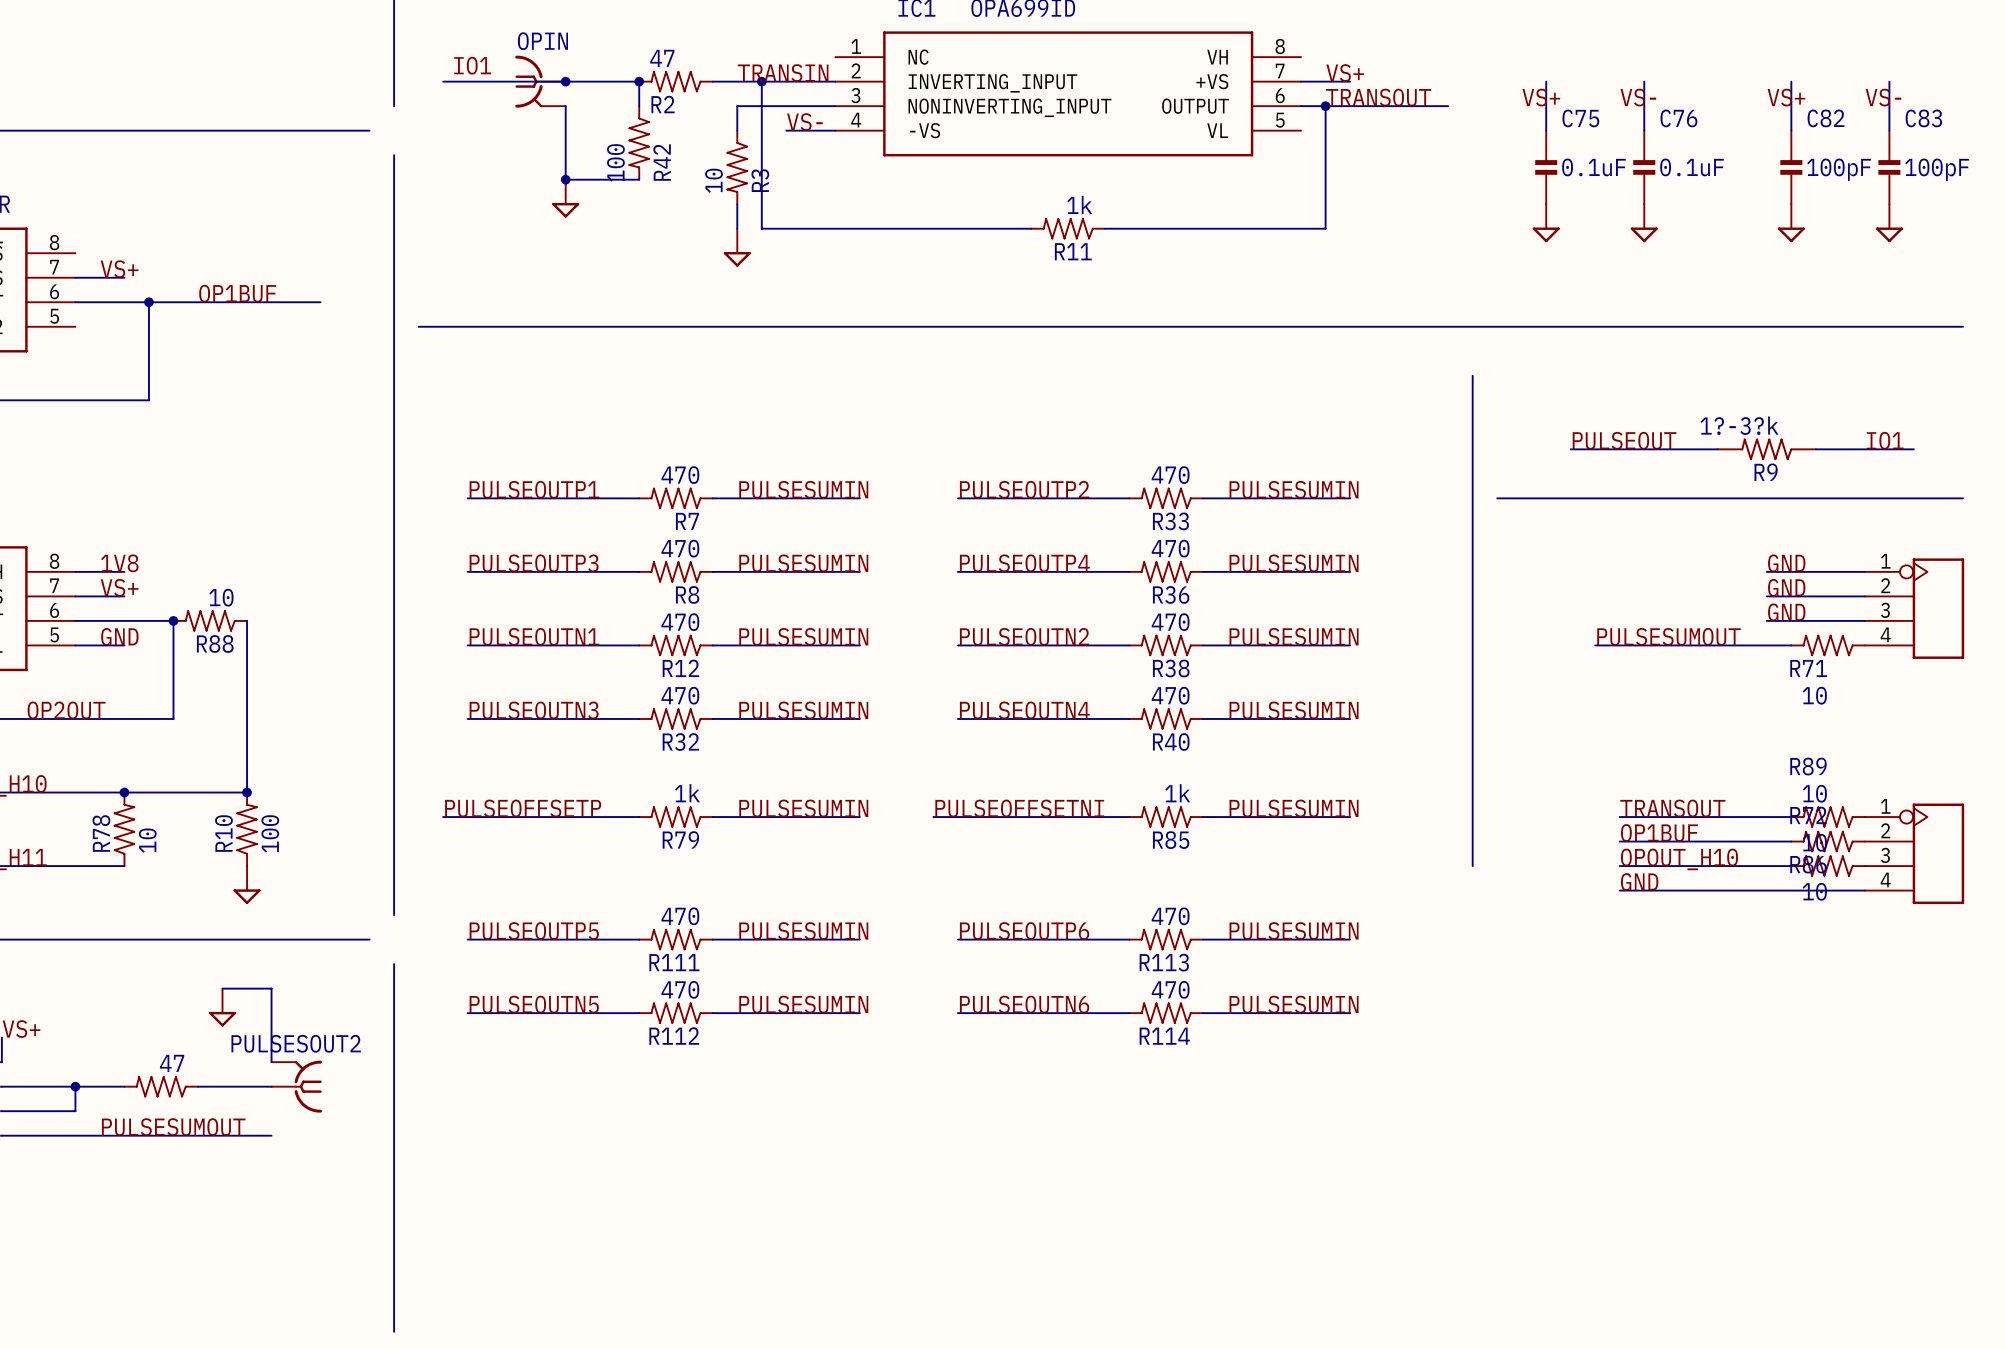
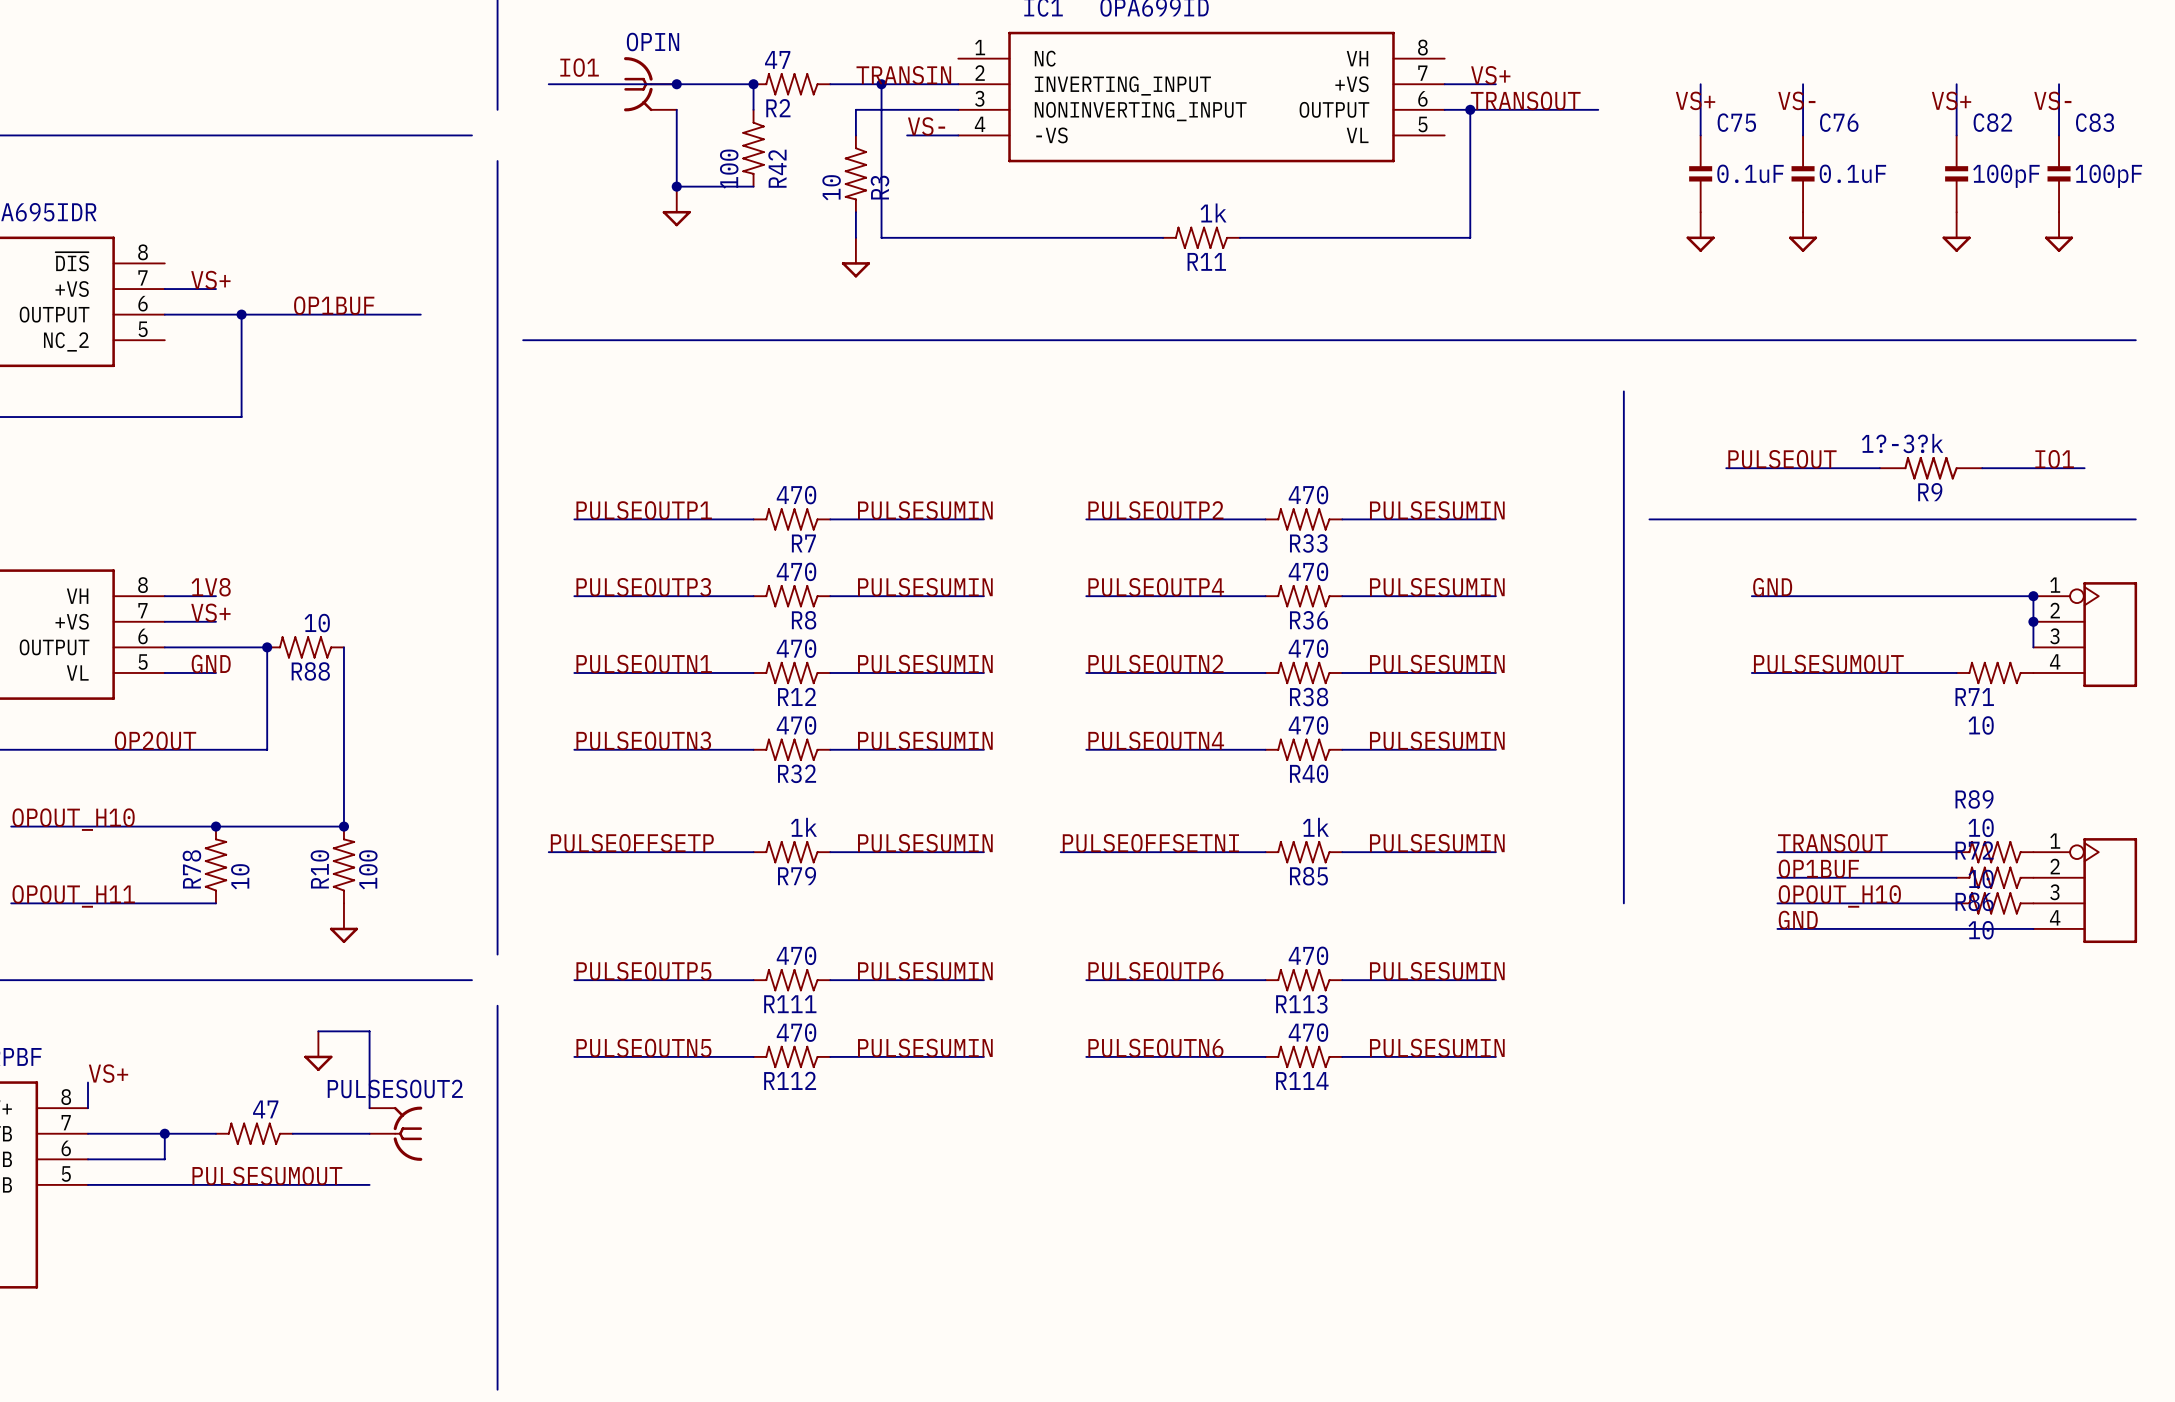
label: none -> GND (1772, 587)
label: GND (1786, 563) -> none
wire: none -> (1751, 596) (1931, 596)
junction: none -> (2033, 596)
label: GND (1786, 587) -> none
wire: (1766, 596) (1864, 596) -> none
junction: none -> (2033, 621)
label: GND (1786, 612) -> none
wire: (1766, 620) (1864, 620) -> (2033, 596) (2033, 647)

